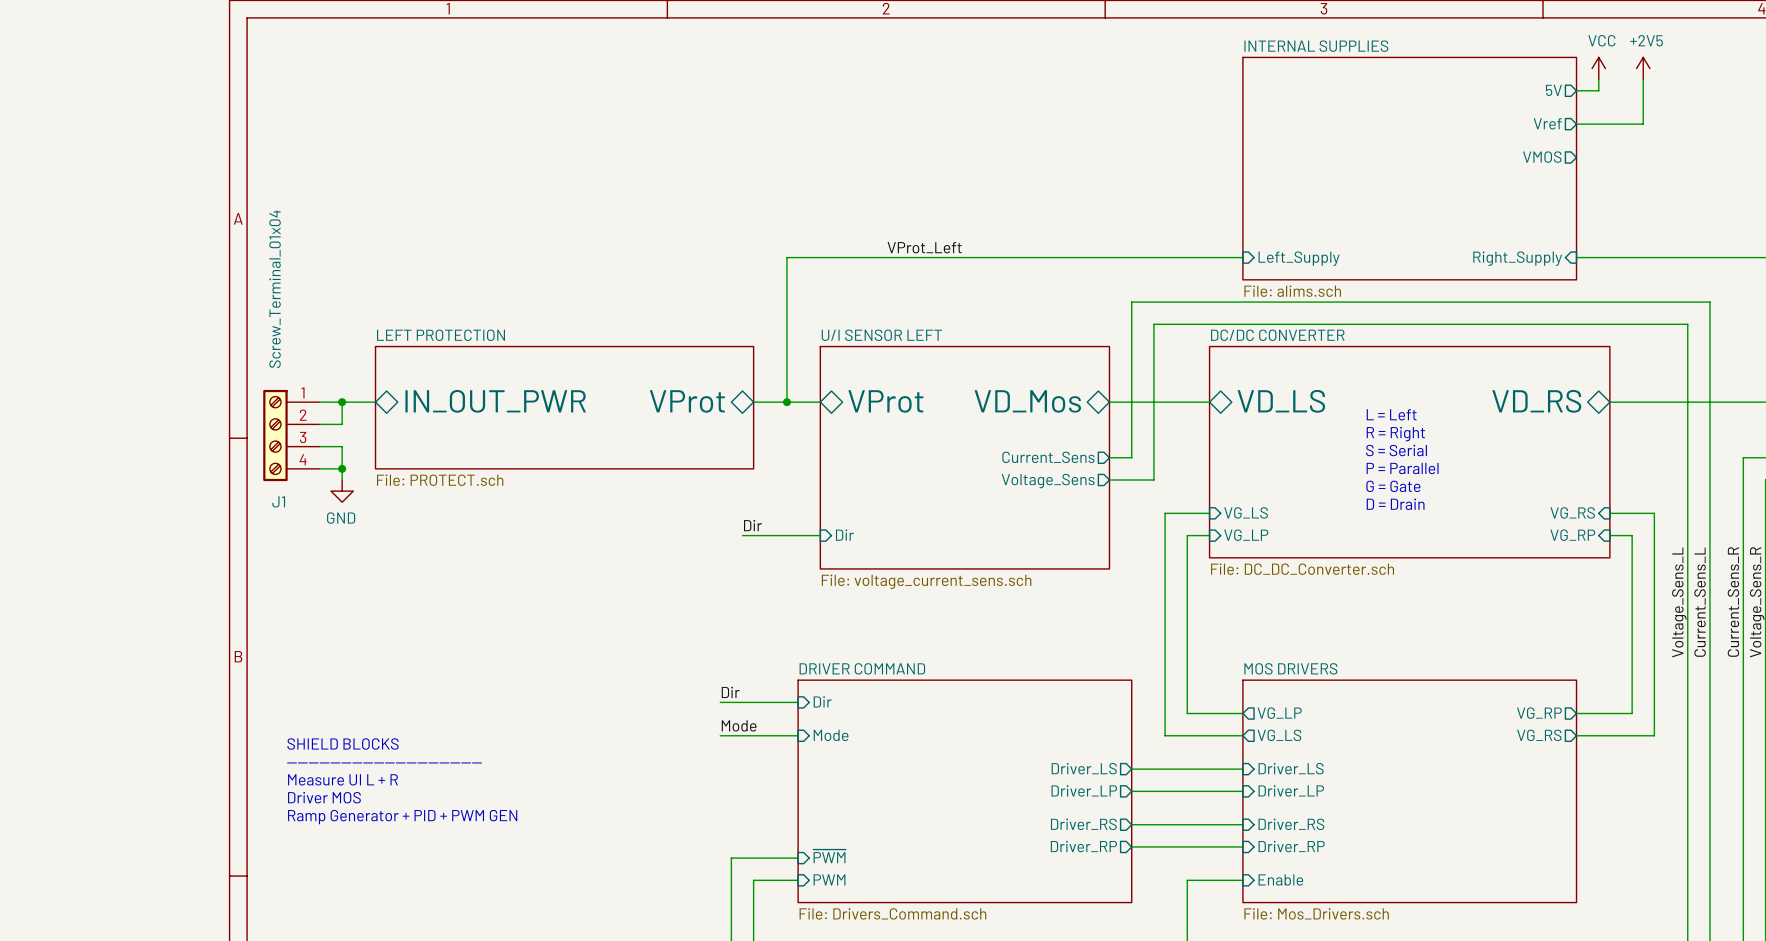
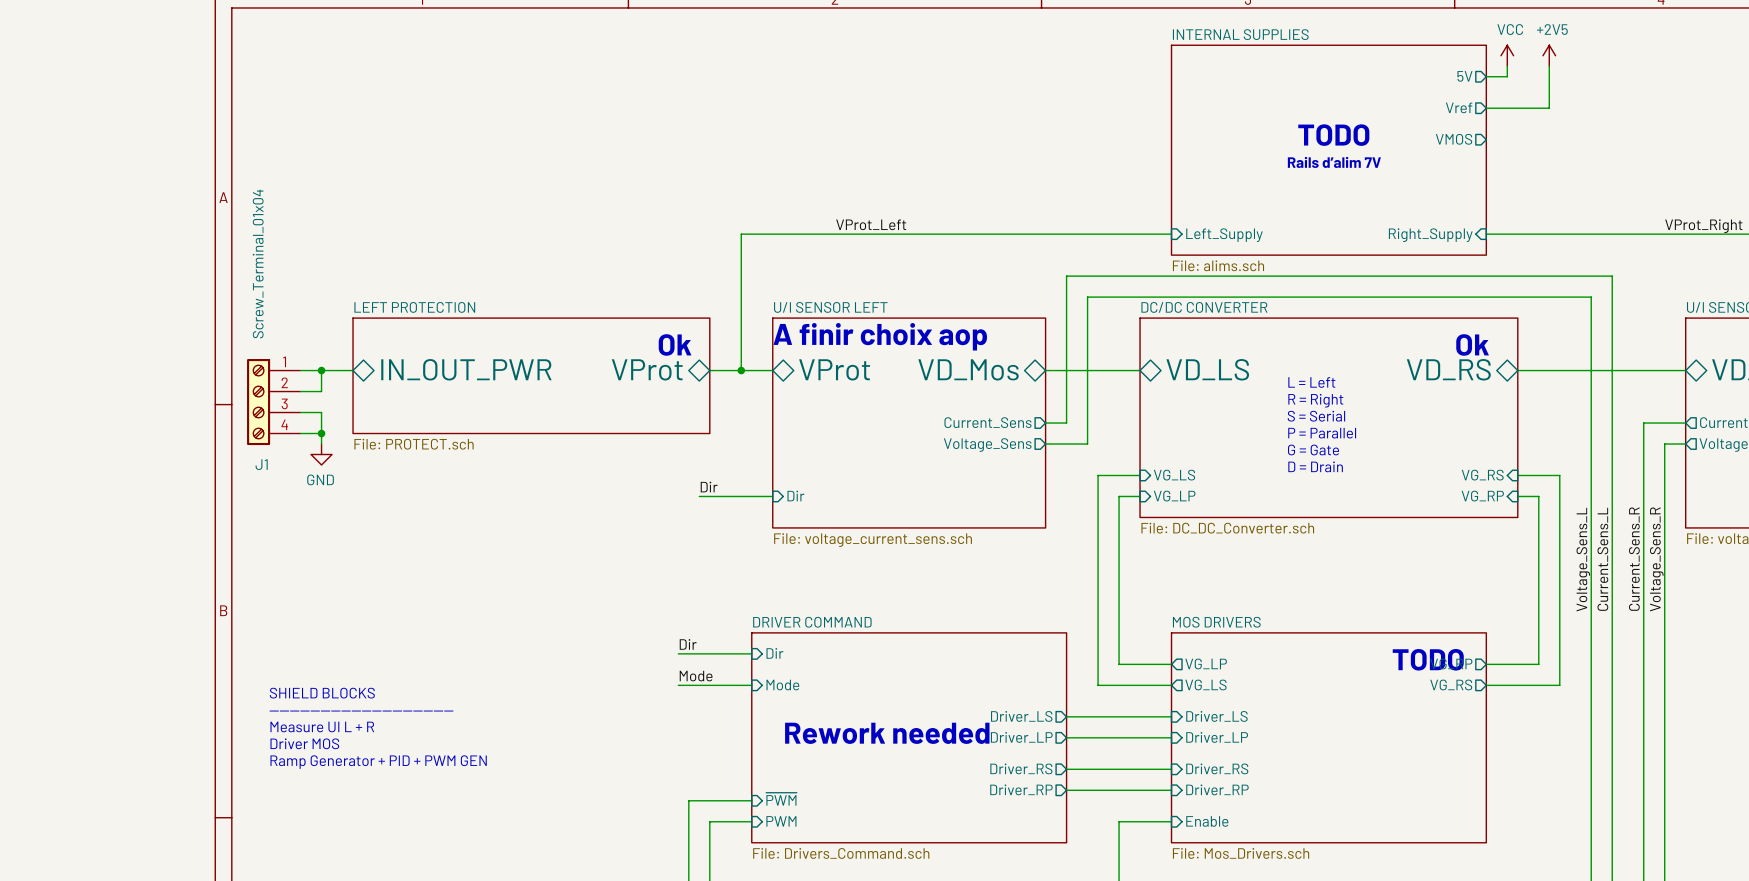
text: none -> TODO (1333, 135)
text: none -> Rails d’alim 7V (1334, 162)
text: none -> A finir choix aop (880, 336)
text: none -> Ok (675, 344)
text: none -> Ok (1472, 344)
text: none -> TODO (1428, 659)
text: none -> Rework needed (887, 733)

